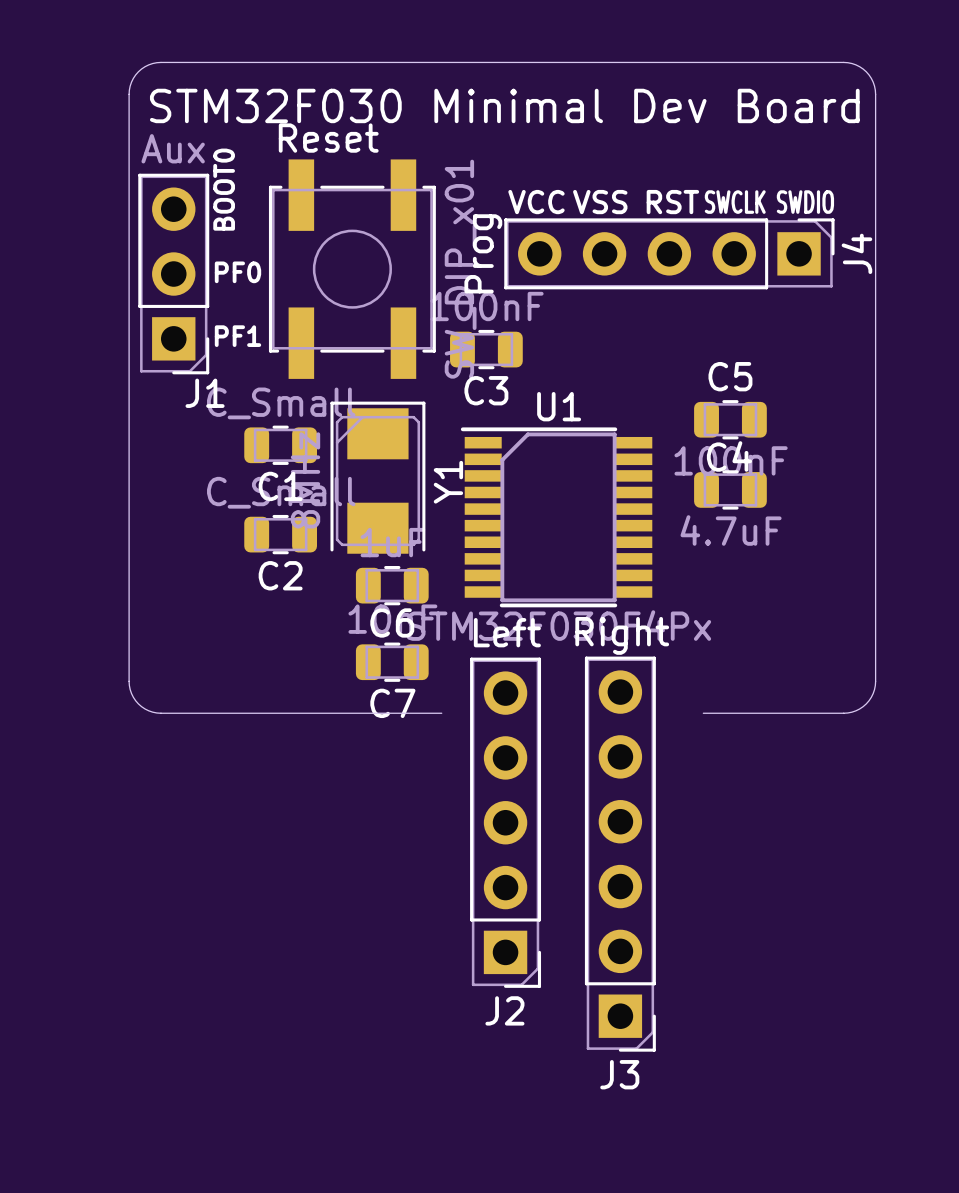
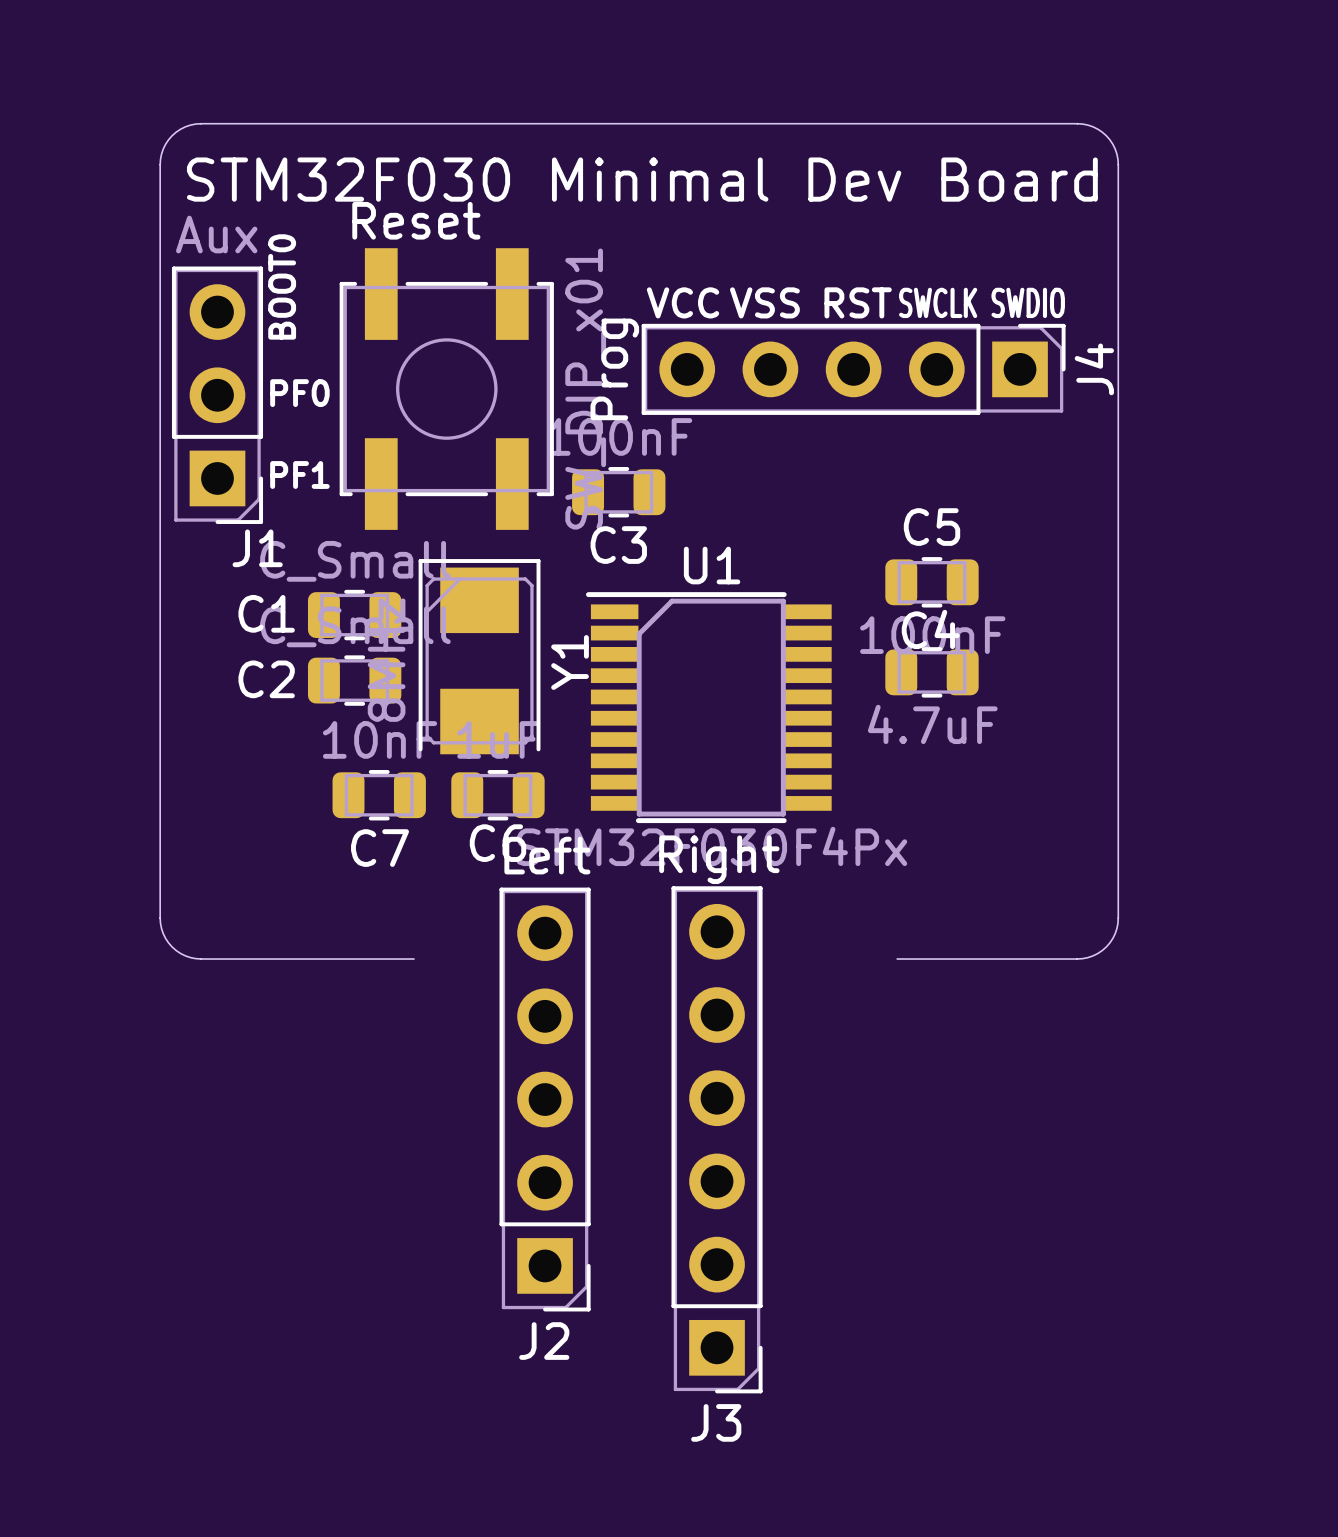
C1 name position: C1 (280, 486) -> C1 (266, 613)
C2 position: (280, 534) -> (354, 680)
C2 name position: C2 (280, 575) -> C2 (266, 679)
C7 position: (392, 662) -> (379, 795)
board edge: (326, 713) (441, 713) -> none
J2 position: (505, 822) -> (545, 1099)
J3 position: (620, 854) -> (717, 1139)

